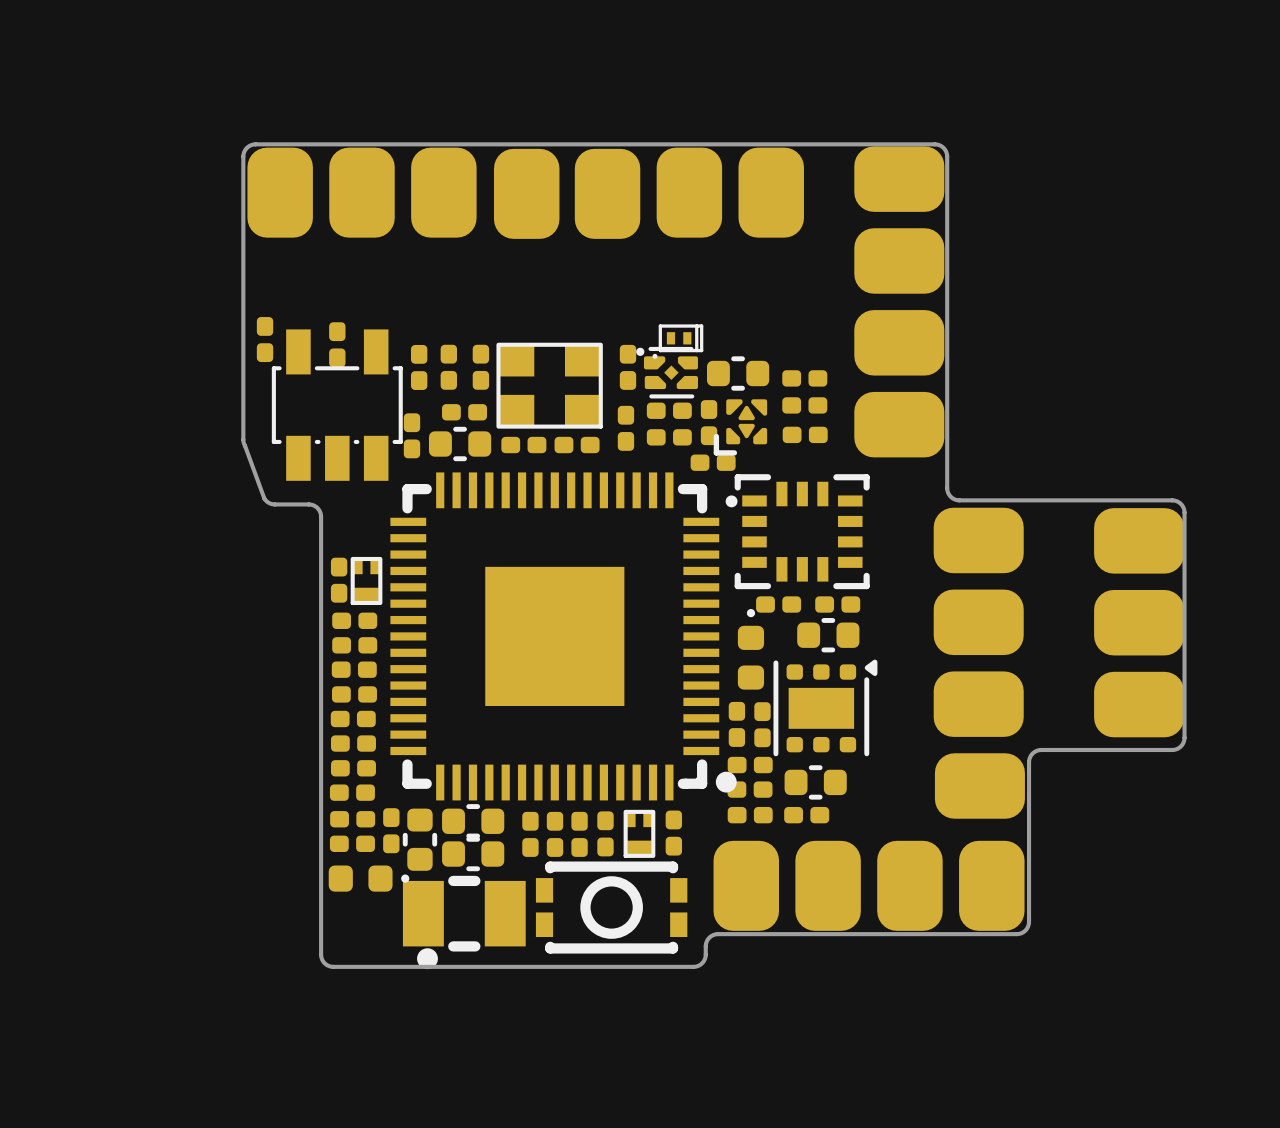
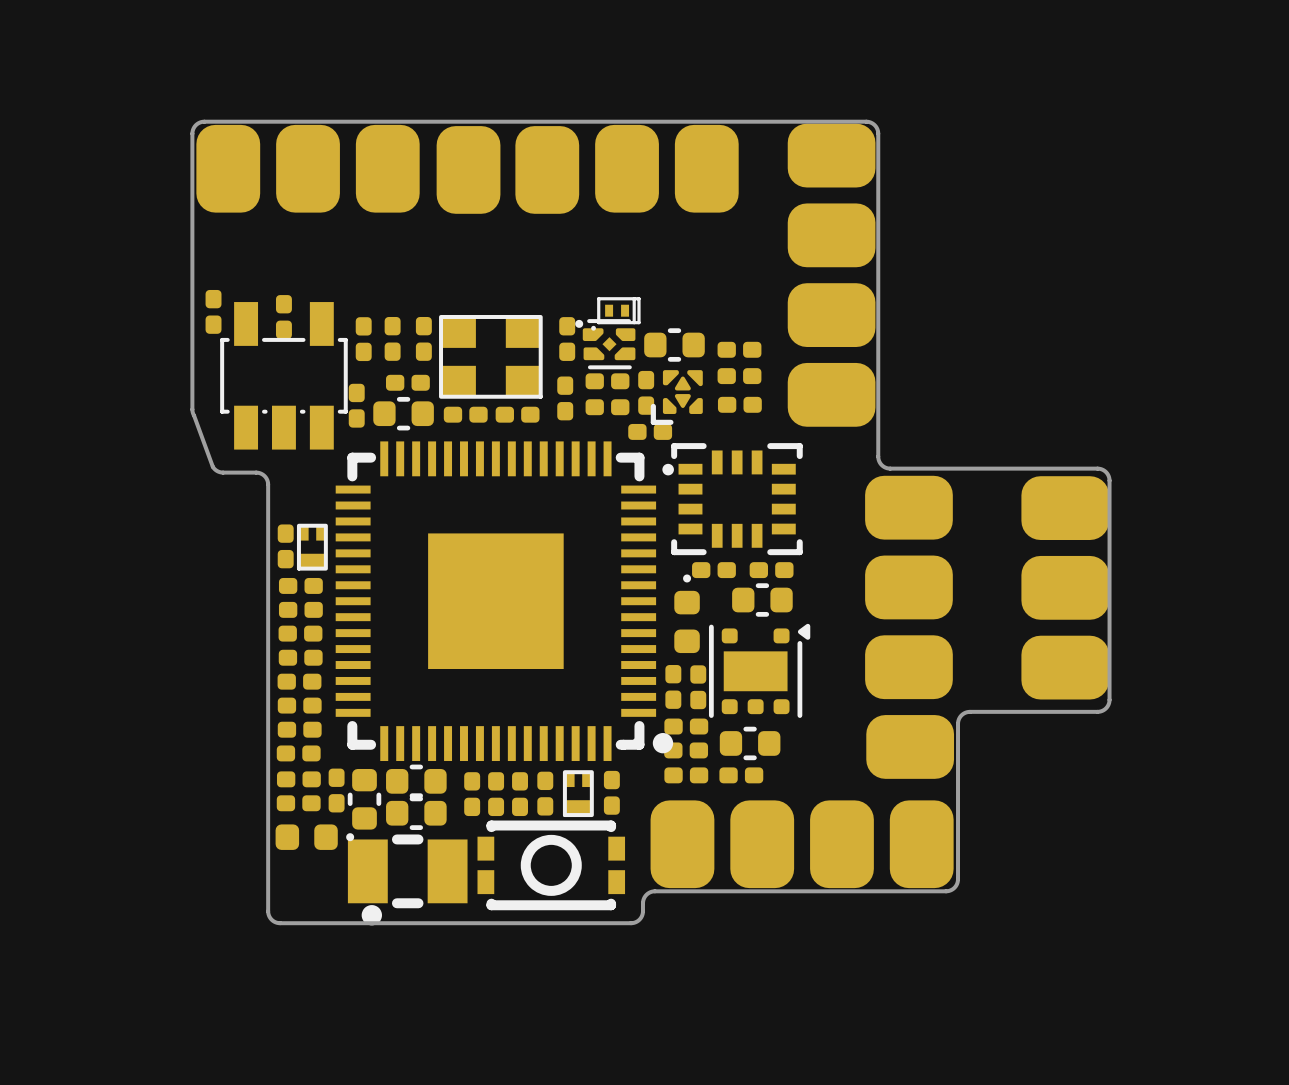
part footprint: [773, 659, 878, 757] -> [708, 623, 811, 718]

